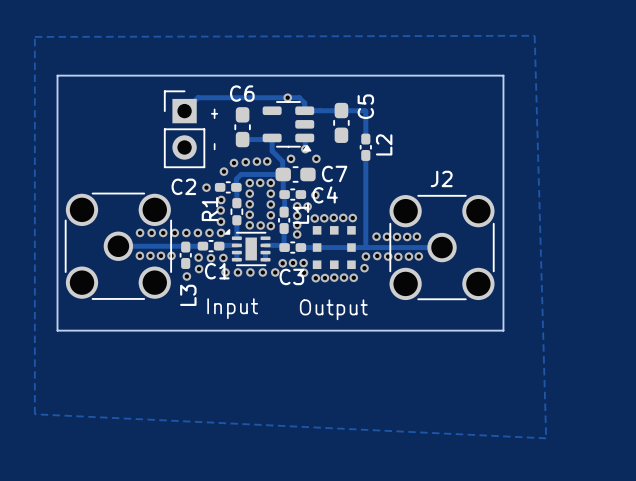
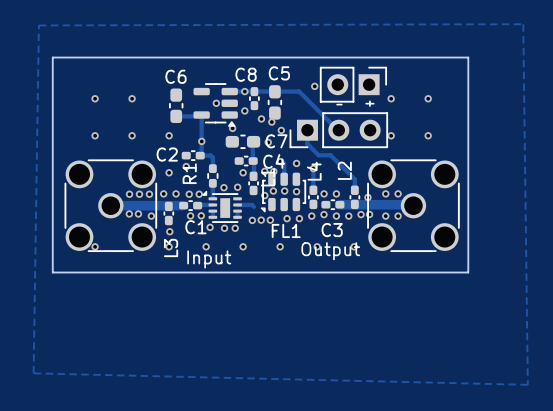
zone outline: (534, 35) (34, 36) (34, 414) (546, 438) (534, 35) -> (523, 24) (38, 25) (33, 373) (527, 384) (523, 24)
board edge: (57, 75) (503, 75) (503, 330) (57, 330) (57, 75) -> (52, 57) (52, 272) (468, 272) (468, 57) (52, 57)
via: (287, 97) -> none
track: (184, 102) (184, 111) (197, 97) (299, 97) (304, 103) (304, 110) (365, 110) (365, 139) -> none
C5 name rotation: 0° (365, 106) -> 90° clockwise (279, 73)
via: none -> (314, 86)
text rotation: 0° (214, 113) -> 90° clockwise (369, 103)
text position: + (214, 113) -> + (369, 103)
track: none -> (229, 91) (298, 91)
via: none -> (244, 91)
track: none -> (299, 91) (338, 130)
C8: none -> (254, 98)
via: none -> (95, 98)
via: none -> (132, 98)
C5 position: (341, 122) -> (274, 102)
via: none -> (391, 98)
via: none -> (428, 98)
part position: (288, 126) -> (215, 105)
via: none -> (216, 103)
C6 position: (242, 127) -> (176, 105)
part rotation: 0° (184, 129) -> 90° clockwise (353, 84)
part position: (184, 129) -> (353, 84)
via: none -> (244, 110)
track: (242, 139) (270, 139) (272, 137) (272, 151) (282, 161) (282, 173) -> none
L2 name position: L2 (384, 144) -> L2 (344, 170)
via: none -> (261, 118)
text rotation: 0° (214, 146) -> 90° clockwise (339, 104)
text position: - (214, 146) -> - (339, 104)
L2 position: (365, 147) -> (354, 197)
track: (365, 155) (365, 247) -> none
via: none -> (232, 128)
via: (291, 158) -> none
track: none -> (307, 130) (307, 144) (318, 155) (330, 155) (354, 179) (354, 190)
part: none -> (338, 130)
via: (256, 161) -> none
via: (267, 161) -> none
via: (245, 162) -> none
via: (234, 163) -> none
via: none -> (95, 135)
via: none -> (132, 135)
via: none -> (169, 135)
via: none -> (391, 135)
via: none -> (428, 135)
via: none -> (268, 142)
track: (283, 174) (241, 174) (236, 179) (236, 190) -> (176, 116) (201, 115) (200, 155) (210, 155) (212, 157)
C7 position: (295, 174) -> (242, 141)
via: (260, 182) -> none
via: (270, 182) -> none
via: (249, 183) -> none
via: (206, 187) -> none
C2 position: (228, 187) -> (193, 155)
via: (249, 193) -> none
via: (270, 193) -> none
C4 position: (292, 194) -> (246, 161)
track: none -> (284, 163) (284, 179)
via: none -> (296, 163)
via: (221, 199) -> none
via: none -> (186, 166)
track: none -> (313, 168) (313, 190)
via: none -> (313, 168)
via: (249, 204) -> none
via: (270, 204) -> none
via: none -> (169, 172)
via: none -> (243, 172)
via: (220, 210) -> none
via: (249, 214) -> none
via: (270, 215) -> none
via: (297, 215) -> none
via: (333, 217) -> none
via: (343, 217) -> none
via: (314, 218) -> none
via: (324, 218) -> none
via: (352, 218) -> none
via: (220, 221) -> none
via: none -> (237, 187)
via: (260, 225) -> none
via: (297, 225) -> none
via: (270, 226) -> none
track: (284, 228) (284, 247) -> none
via: none -> (273, 191)
via: none -> (284, 191)
via: none -> (296, 191)
FL1: none -> (283, 192)
via: (174, 232) -> none
via: none -> (163, 193)
via: (186, 232) -> none
via: none -> (176, 193)
via: (197, 232) -> none
via: none -> (324, 193)
via: none -> (336, 193)
via: none -> (385, 193)
via: none -> (398, 193)
L4: none -> (313, 197)
via: (376, 236) -> none
via: (387, 236) -> none
via: (397, 236) -> none
via: (407, 236) -> none
track: none -> (339, 204) (413, 205)
track width: thin (118, 246) (201, 246) -> thick (110, 205) (182, 205)
part: none -> (413, 205)
C3 position: (292, 247) -> (332, 204)
track: (300, 247) (442, 247) -> none
part: (334, 247) -> none
J2: (442, 247) -> none
via: (160, 255) -> none
via: (171, 255) -> none
via: (377, 256) -> none
via: (388, 256) -> none
via: (398, 256) -> none
via: (198, 257) -> none
via: none -> (151, 216)
via: none -> (311, 216)
via: none -> (336, 216)
via: none -> (348, 216)
via: none -> (385, 216)
via: none -> (398, 216)
via: none -> (287, 218)
via: none -> (299, 218)
via: (364, 268) -> none
via: (199, 269) -> none
via: none -> (210, 227)
via: (225, 272) -> none
via: (237, 272) -> none
via: (275, 272) -> none
via: (304, 272) -> none
via: (334, 277) -> none
via: (344, 277) -> none
via: (353, 277) -> none
via: (315, 278) -> none
via: (324, 278) -> none
via: none -> (95, 246)
via: none -> (169, 246)
via: none -> (206, 246)
via: none -> (243, 246)
via: none -> (280, 246)
via: none -> (317, 246)
via: none -> (354, 246)
text position: Output (333, 309) -> Output (330, 251)

